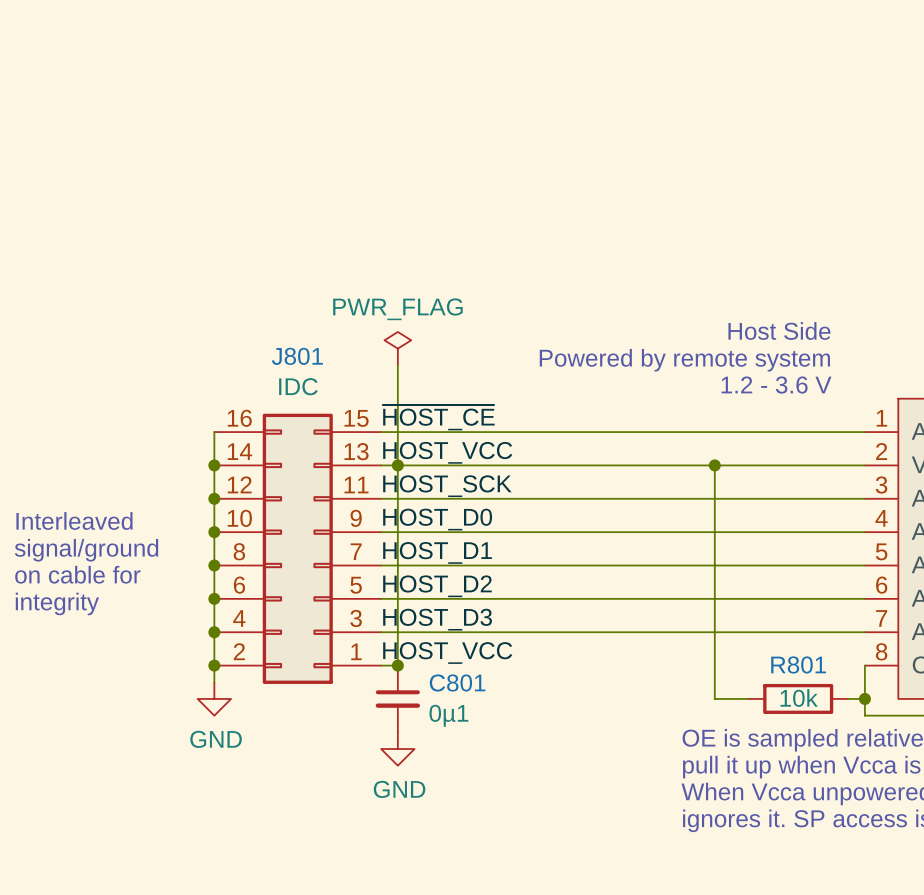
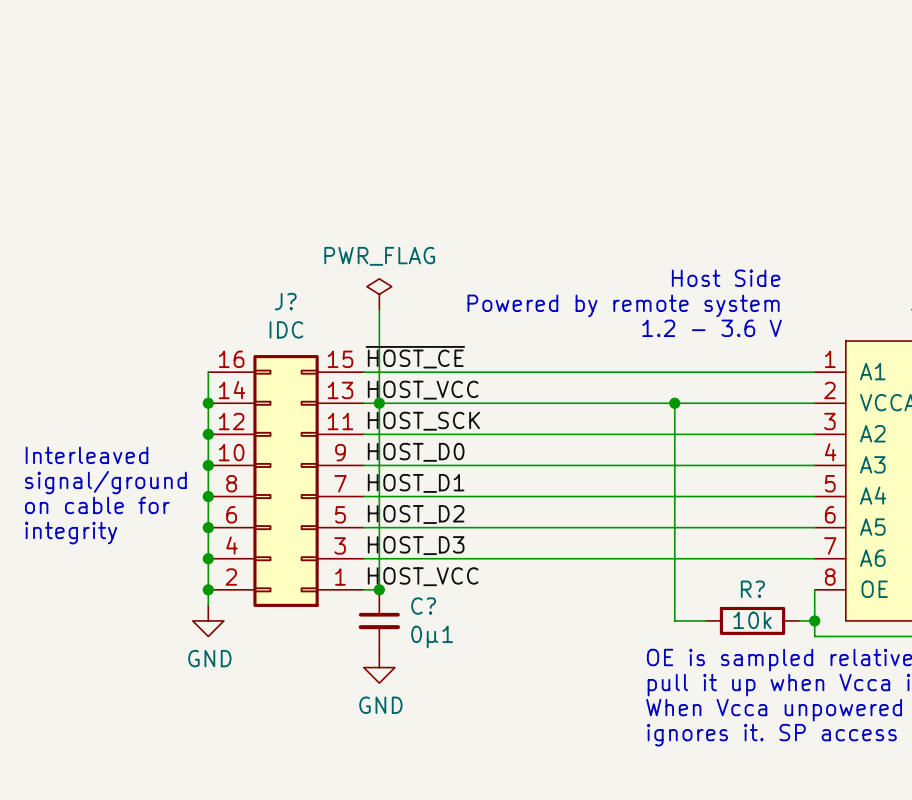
J801 name: J801 (297, 356) -> J? (285, 301)
R801 name: R801 (798, 664) -> R? (752, 589)
C801 name: C801 (457, 682) -> C? (423, 606)

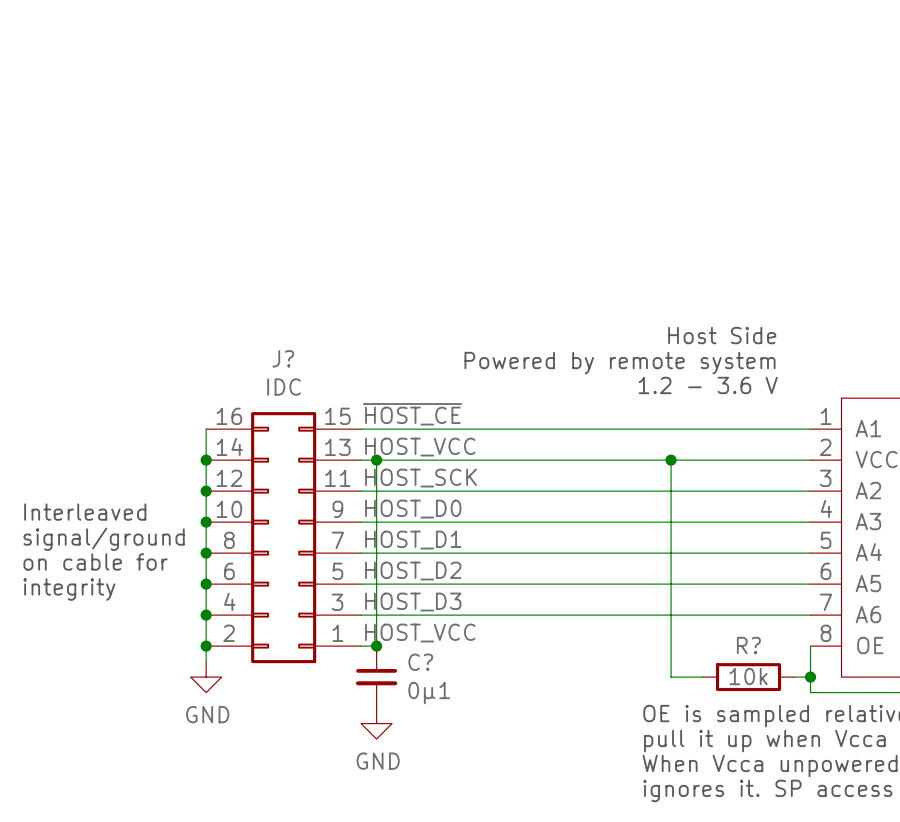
power symbol: PWR_FLAG (379, 294) -> none
wire: (379, 309) (379, 403) -> none

